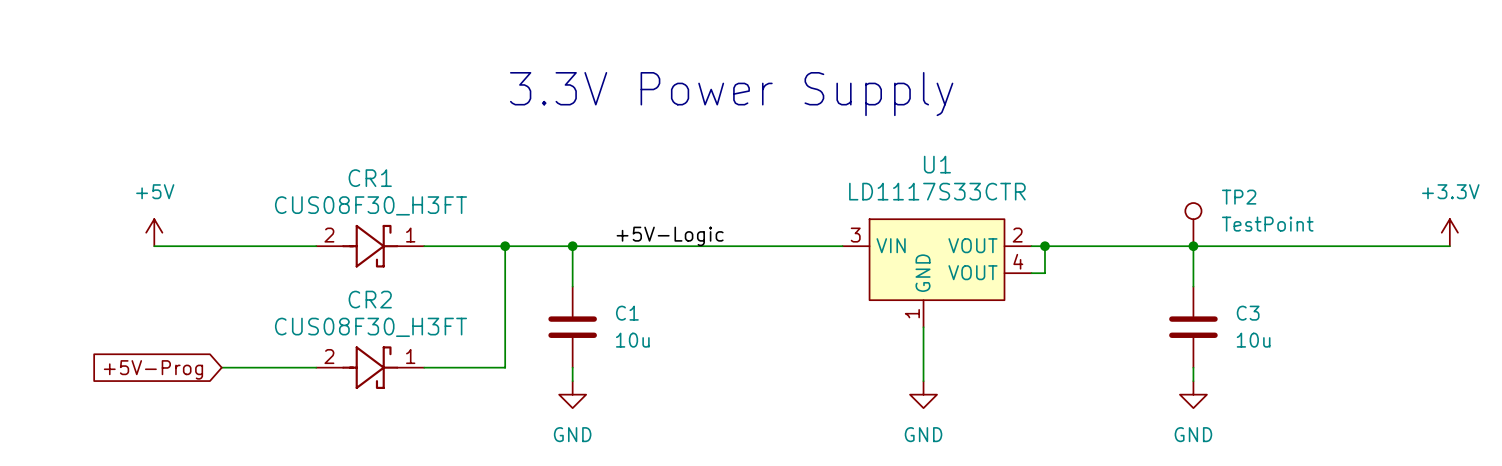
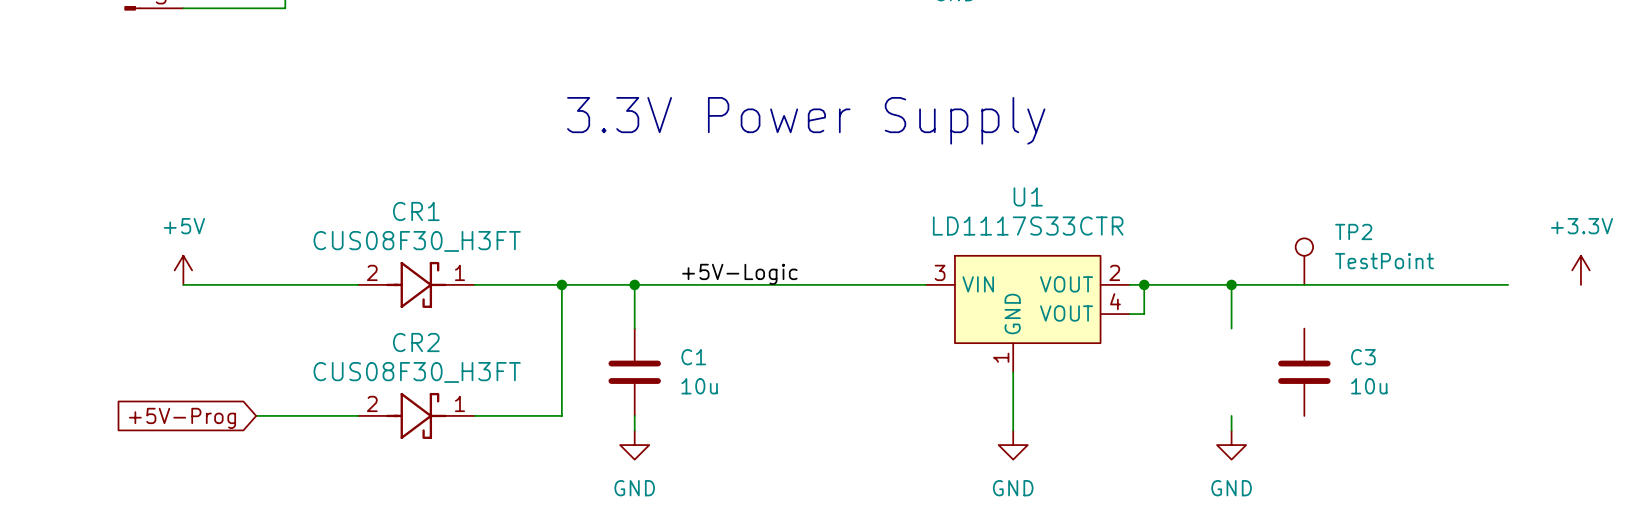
junction: none -> (1231, 284)
wire: (1193, 246) (1193, 286) -> (1231, 284) (1231, 328)
junction: (1193, 246) -> none
wire: (1382, 246) (1449, 246) -> none
wire: (1193, 367) (1193, 381) -> (1231, 415) (1231, 430)
power symbol position: GND (1193, 394) -> GND (1231, 445)

